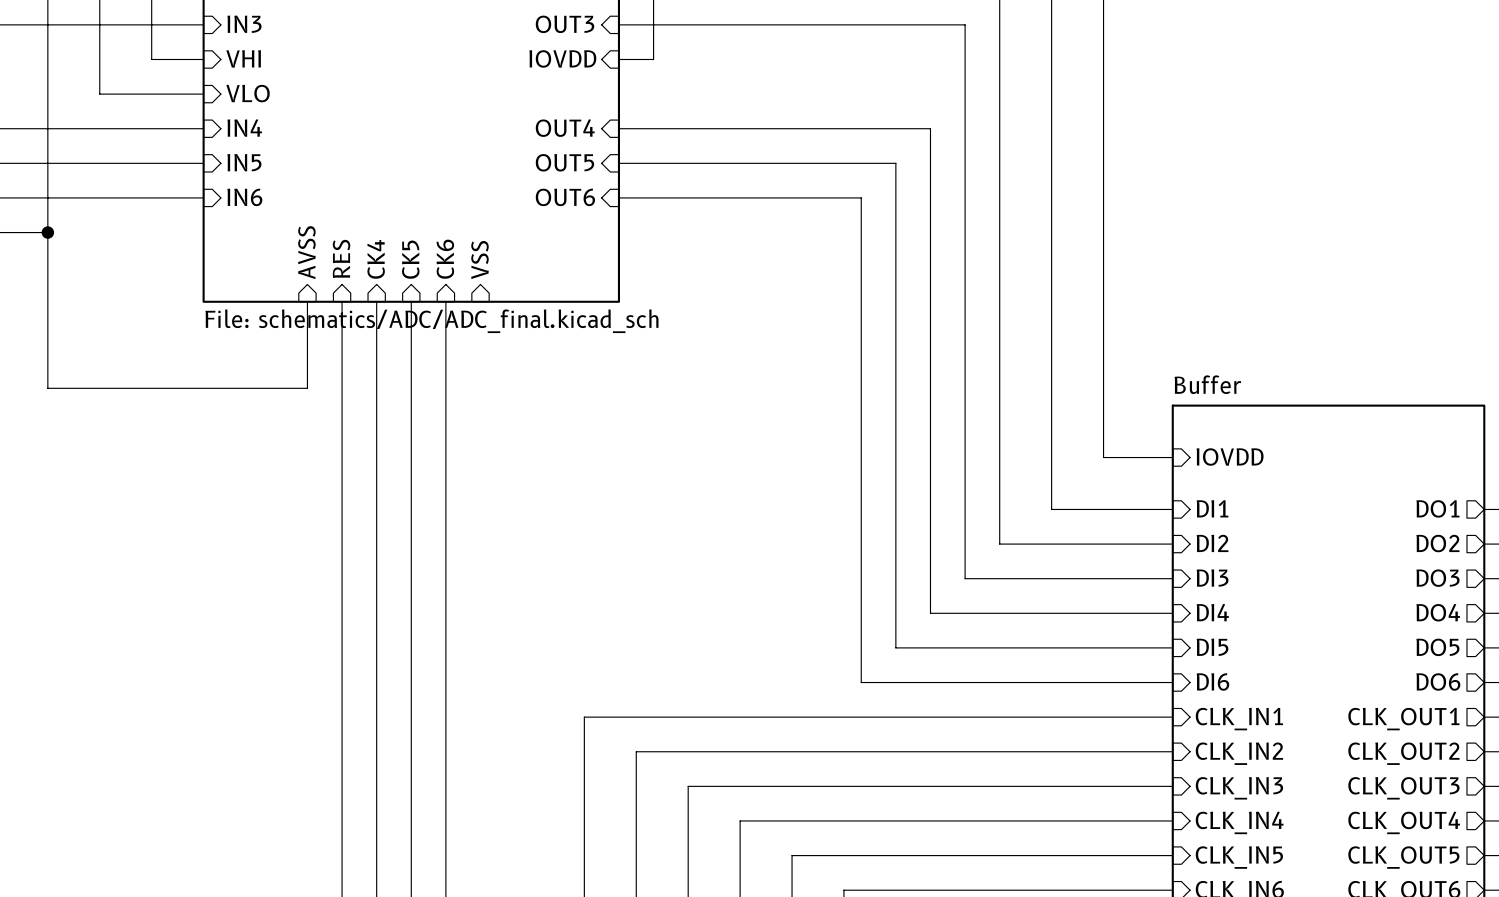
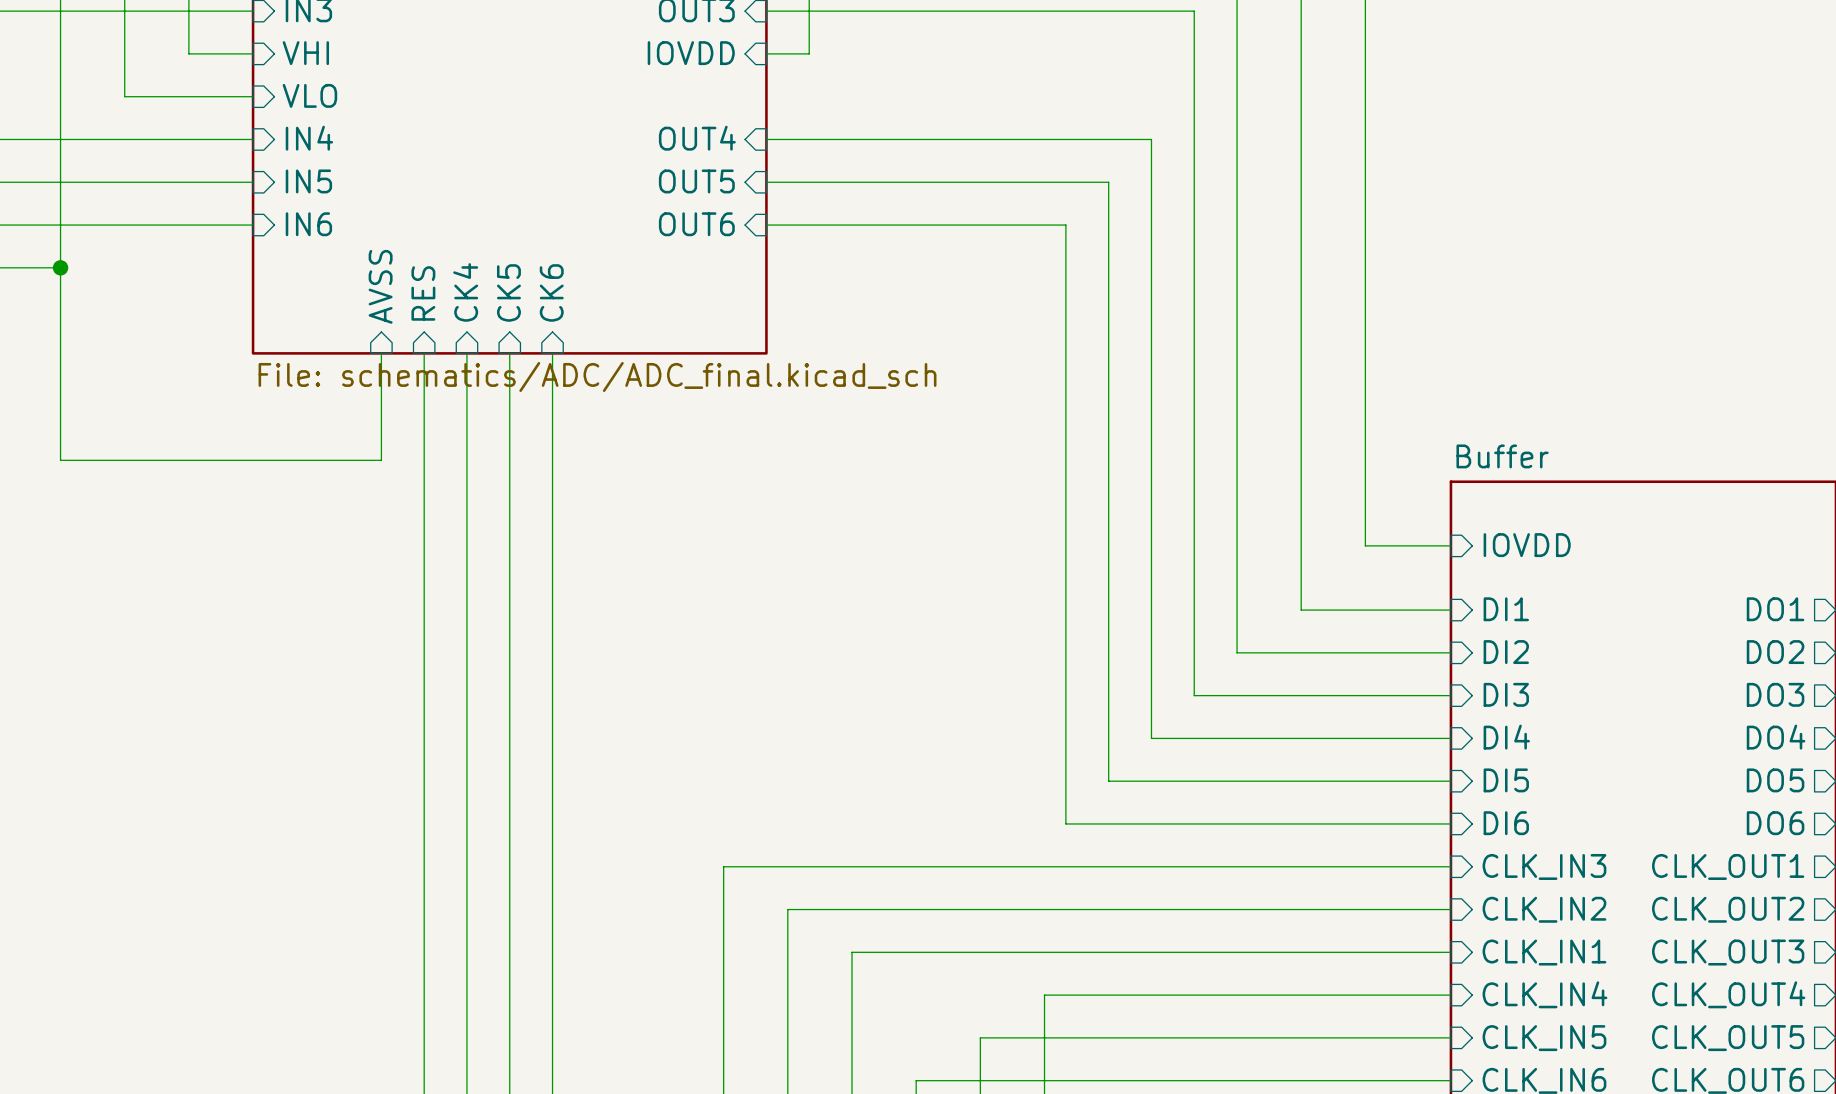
sheet pin: VSS (479, 260) -> none
sheet pin: CLK_IN1 (1239, 719) -> CLK_IN3 (1544, 866)
sheet pin: CLK_IN3 (1239, 788) -> CLK_IN1 (1544, 952)
wire: (843, 820) (740, 820) (740, 890) -> (1044, 995) (1044, 1080) (916, 1080)

